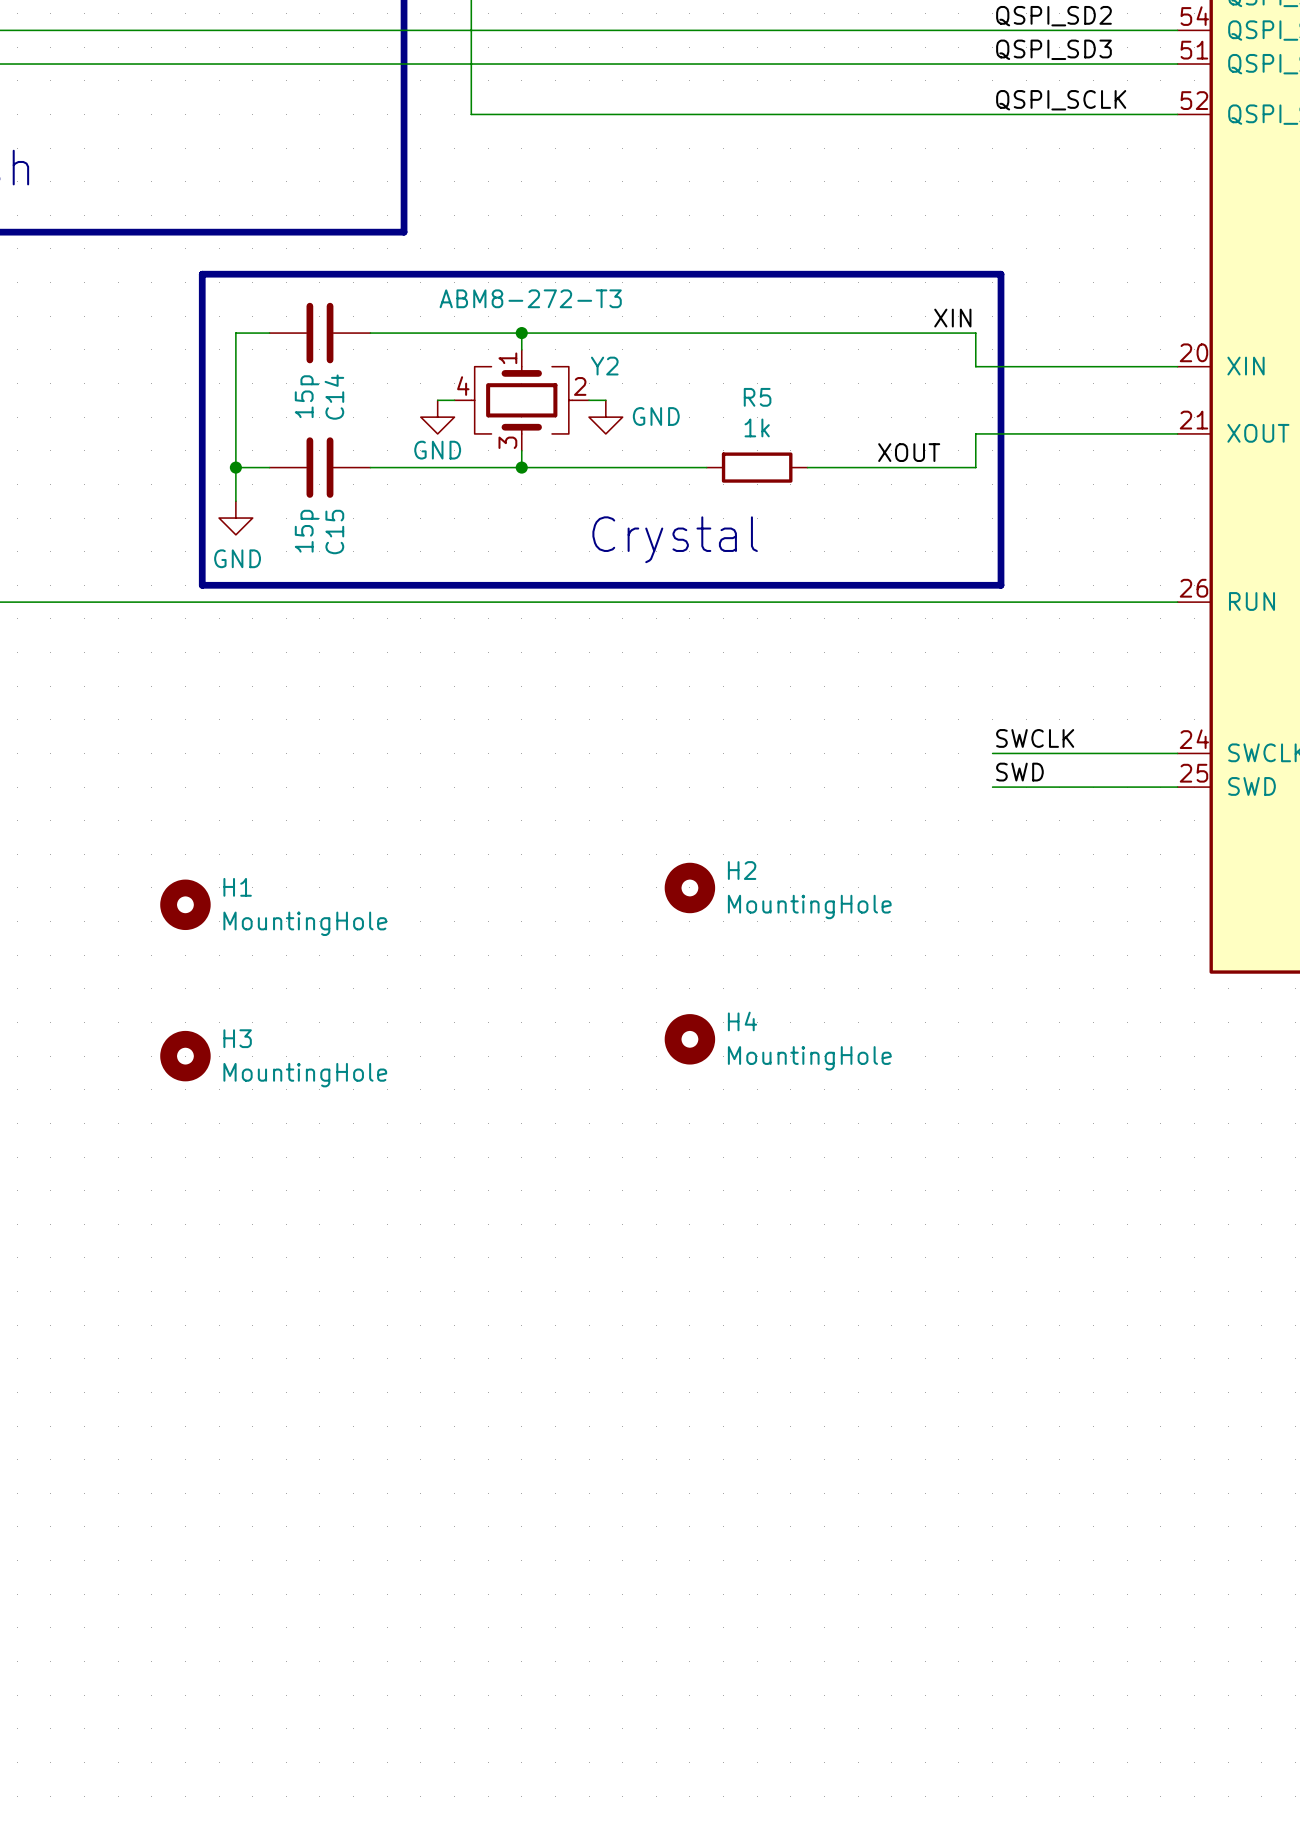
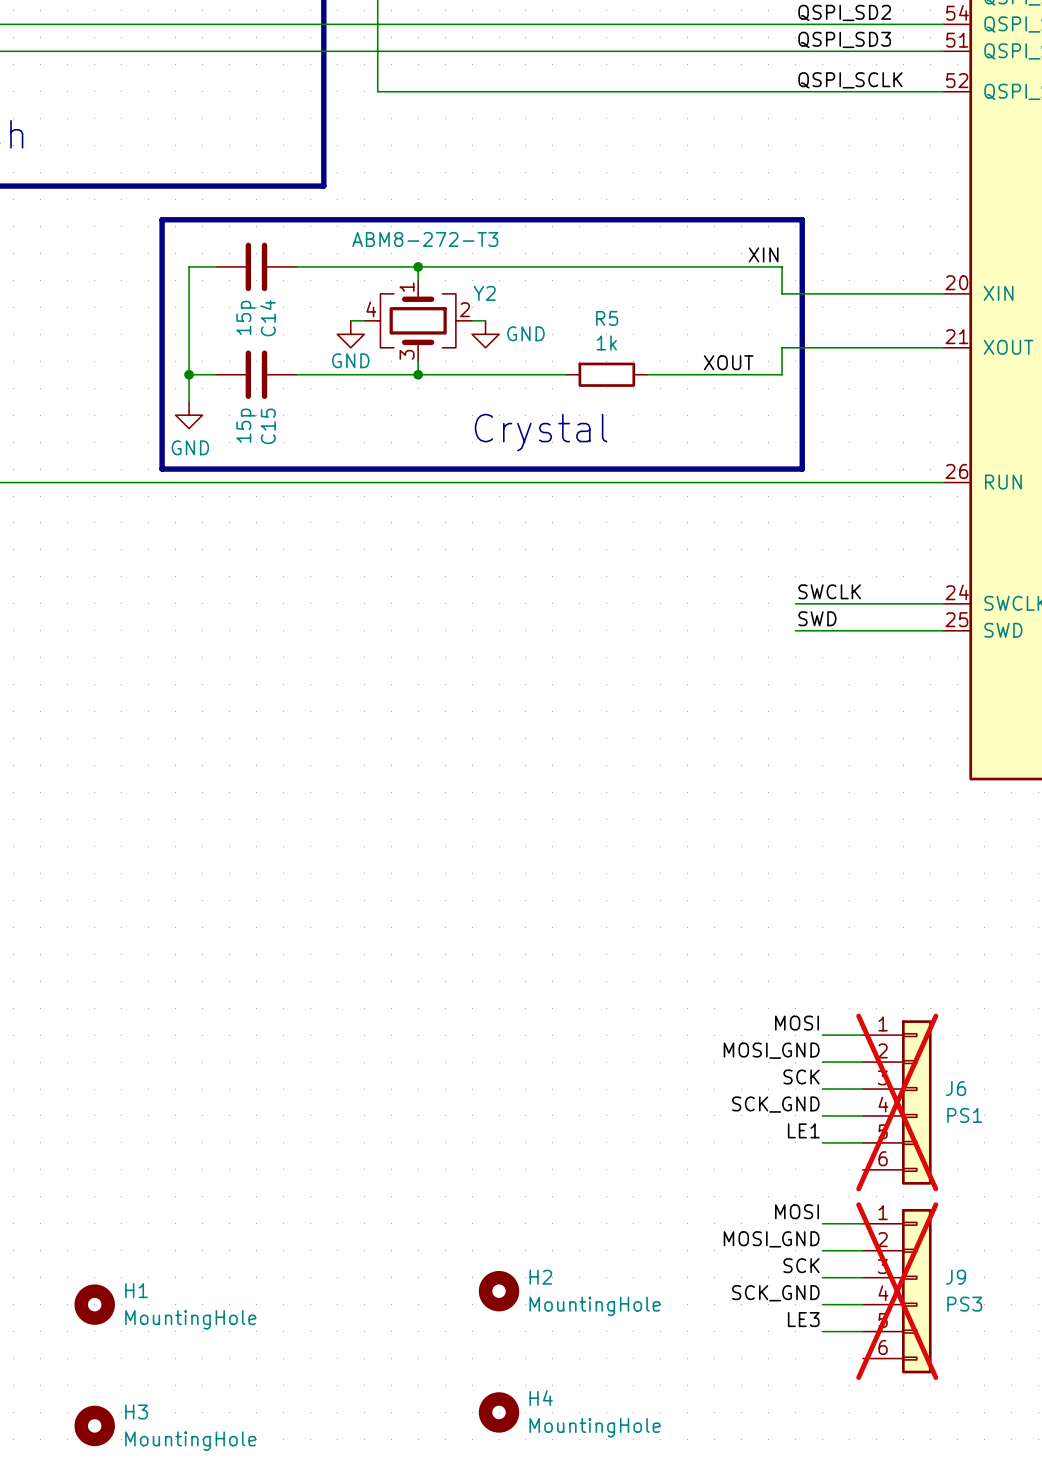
H2 position: (689, 887) -> (499, 1291)
H1 position: (185, 904) -> (94, 1304)
H4 position: (689, 1039) -> (499, 1412)
H3 position: (185, 1056) -> (94, 1425)
label: none -> MOSI (797, 1023)
wire: none -> (822, 1035) (862, 1035)
label: none -> MOSI_GND (771, 1050)
wire: none -> (822, 1062) (862, 1062)
label: none -> SCK (801, 1076)
wire: none -> (822, 1089) (862, 1089)
J6: none -> PS1 (897, 1102)
label: none -> SCK_GND (775, 1104)
wire: none -> (822, 1115) (862, 1115)
label: none -> LE1 (803, 1130)
wire: none -> (822, 1142) (862, 1142)
label: none -> MOSI (797, 1211)
wire: none -> (822, 1223) (862, 1223)
label: none -> MOSI_GND (771, 1239)
wire: none -> (822, 1250) (862, 1250)
label: none -> SCK (801, 1265)
wire: none -> (822, 1277) (862, 1277)
J9: none -> PS3 (897, 1291)
label: none -> SCK_GND (775, 1293)
wire: none -> (822, 1304) (862, 1304)
label: none -> LE3 (803, 1319)
wire: none -> (822, 1331) (862, 1331)

